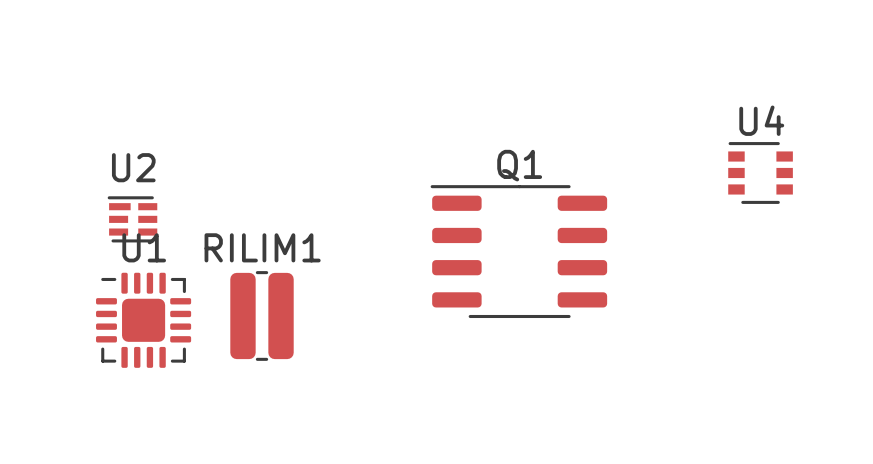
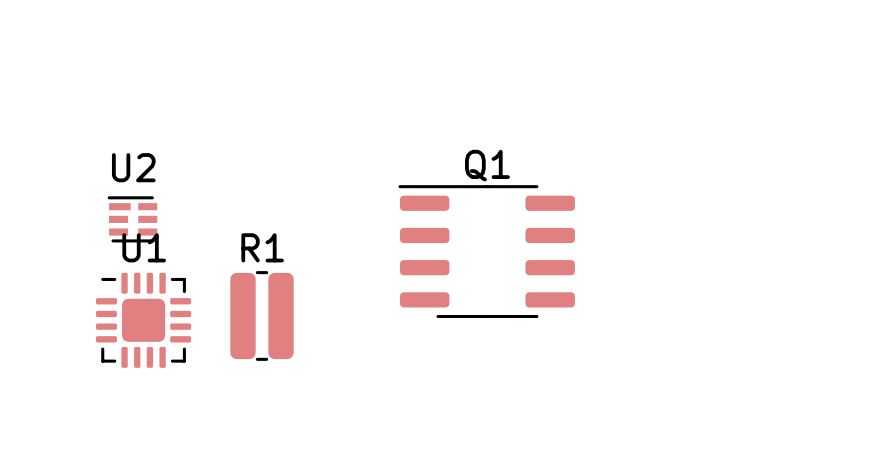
U4: (760, 172) -> none
RILIM1 name: RILIM1 (262, 247) -> R1 (262, 247)
Q1 position: (518, 251) -> (486, 251)

